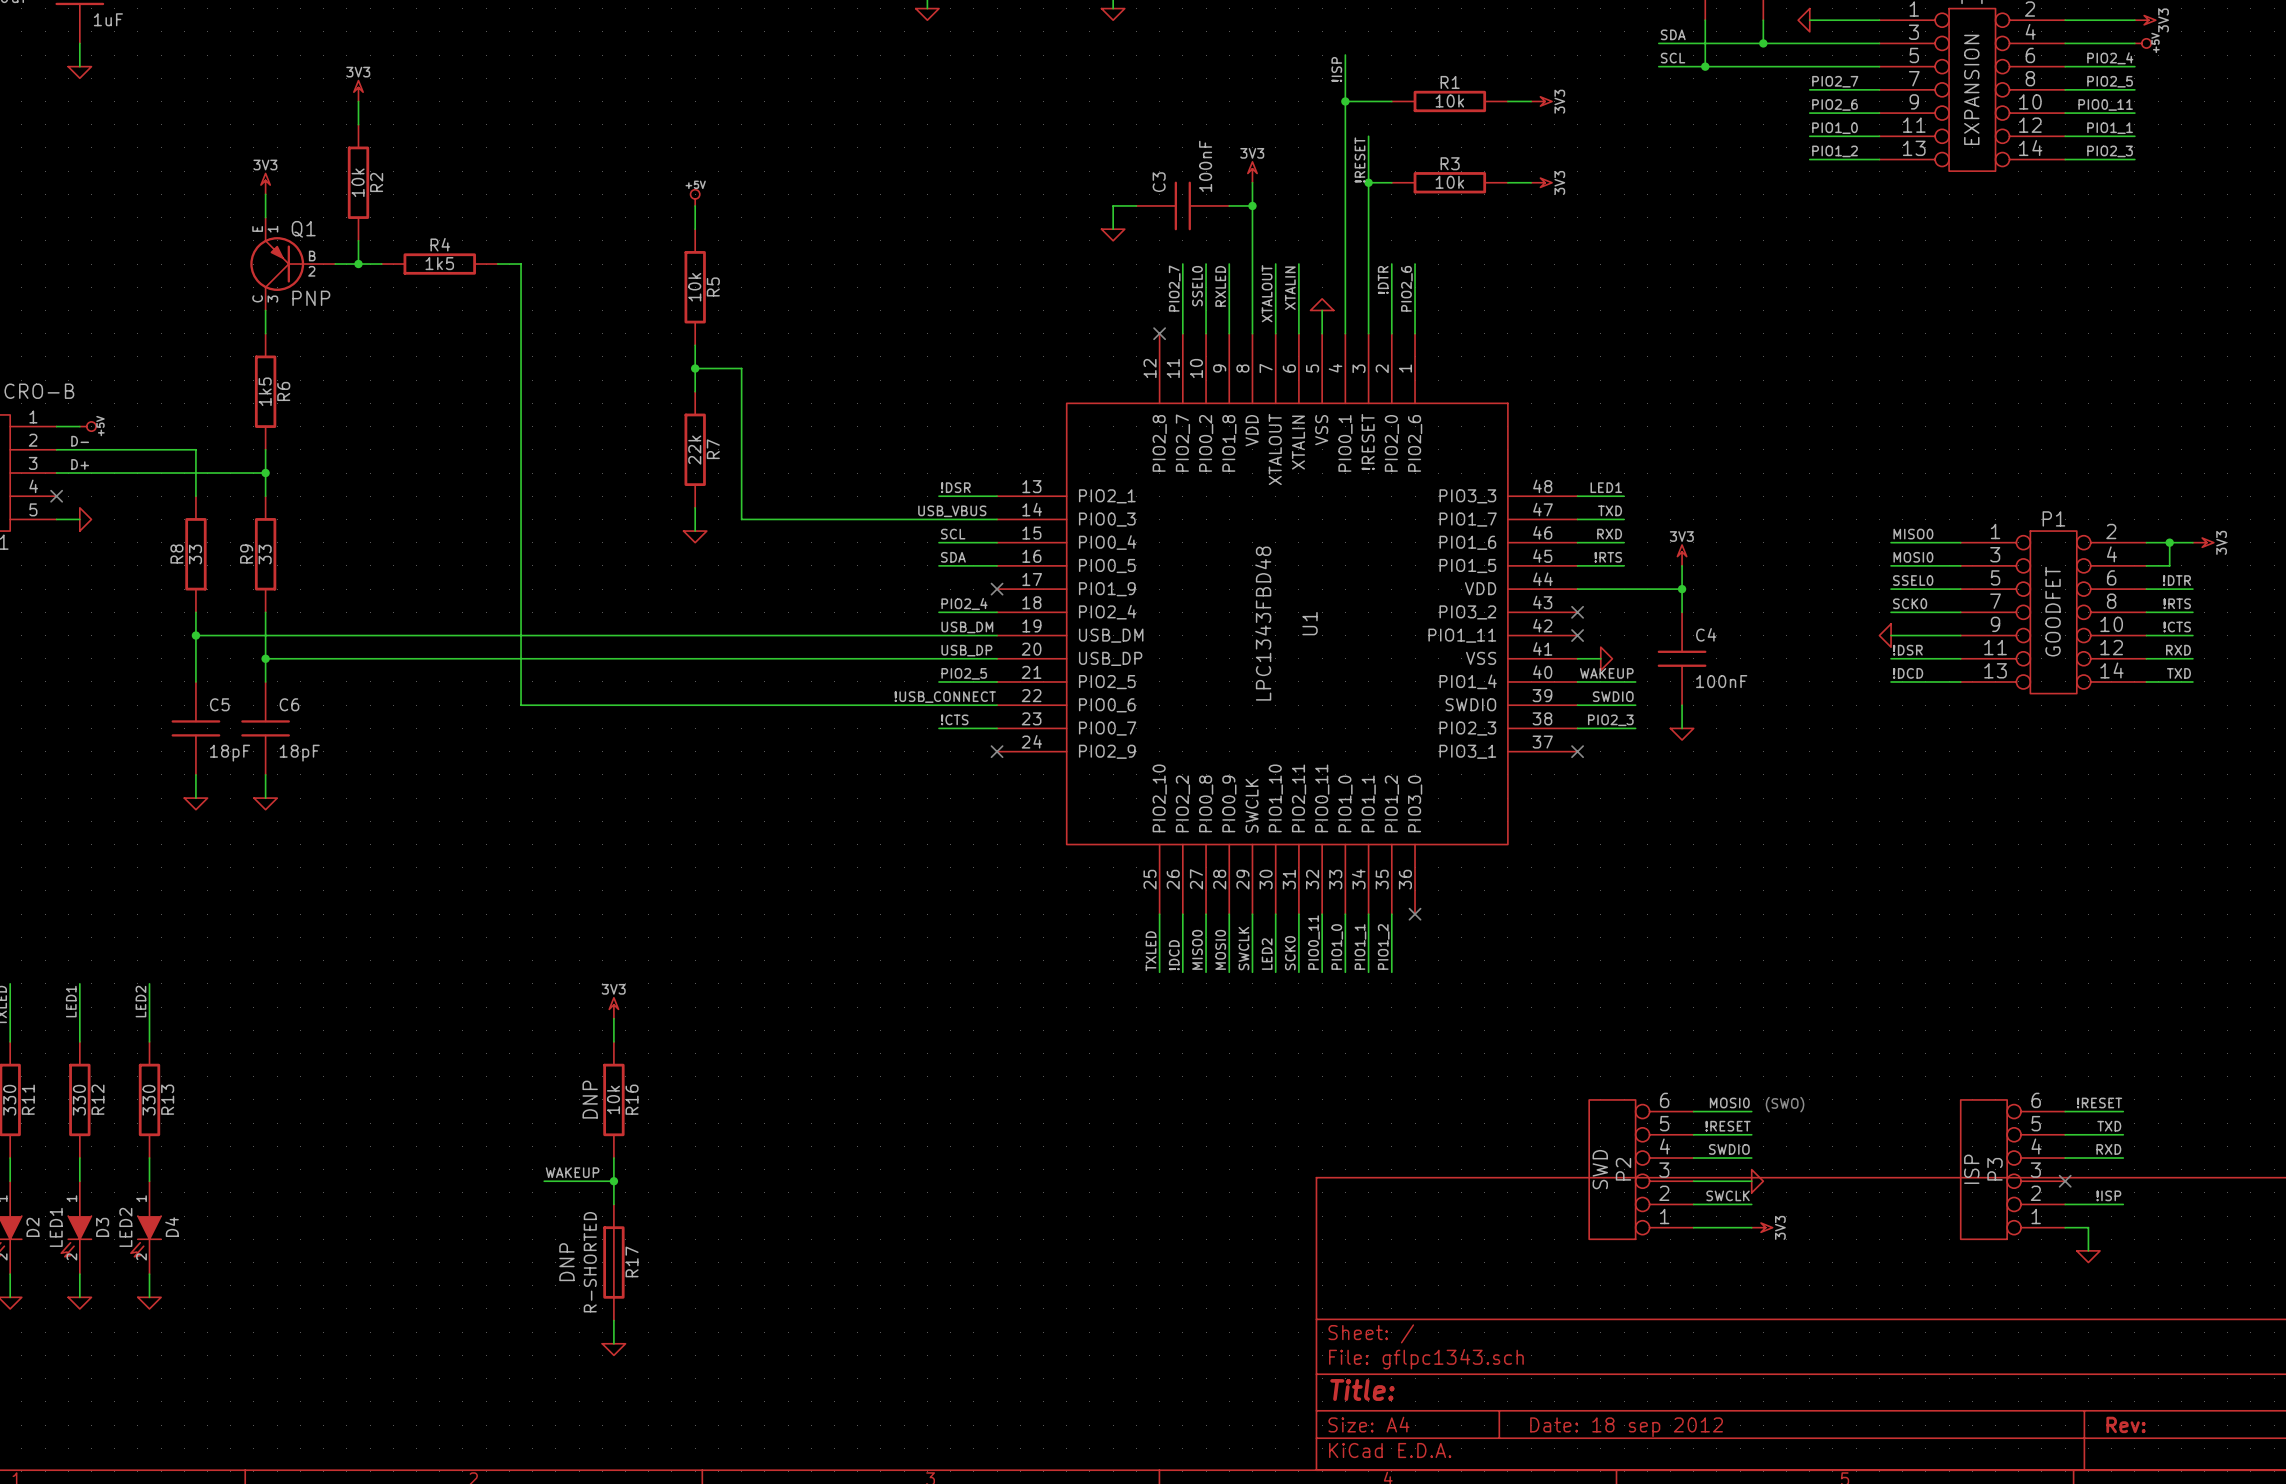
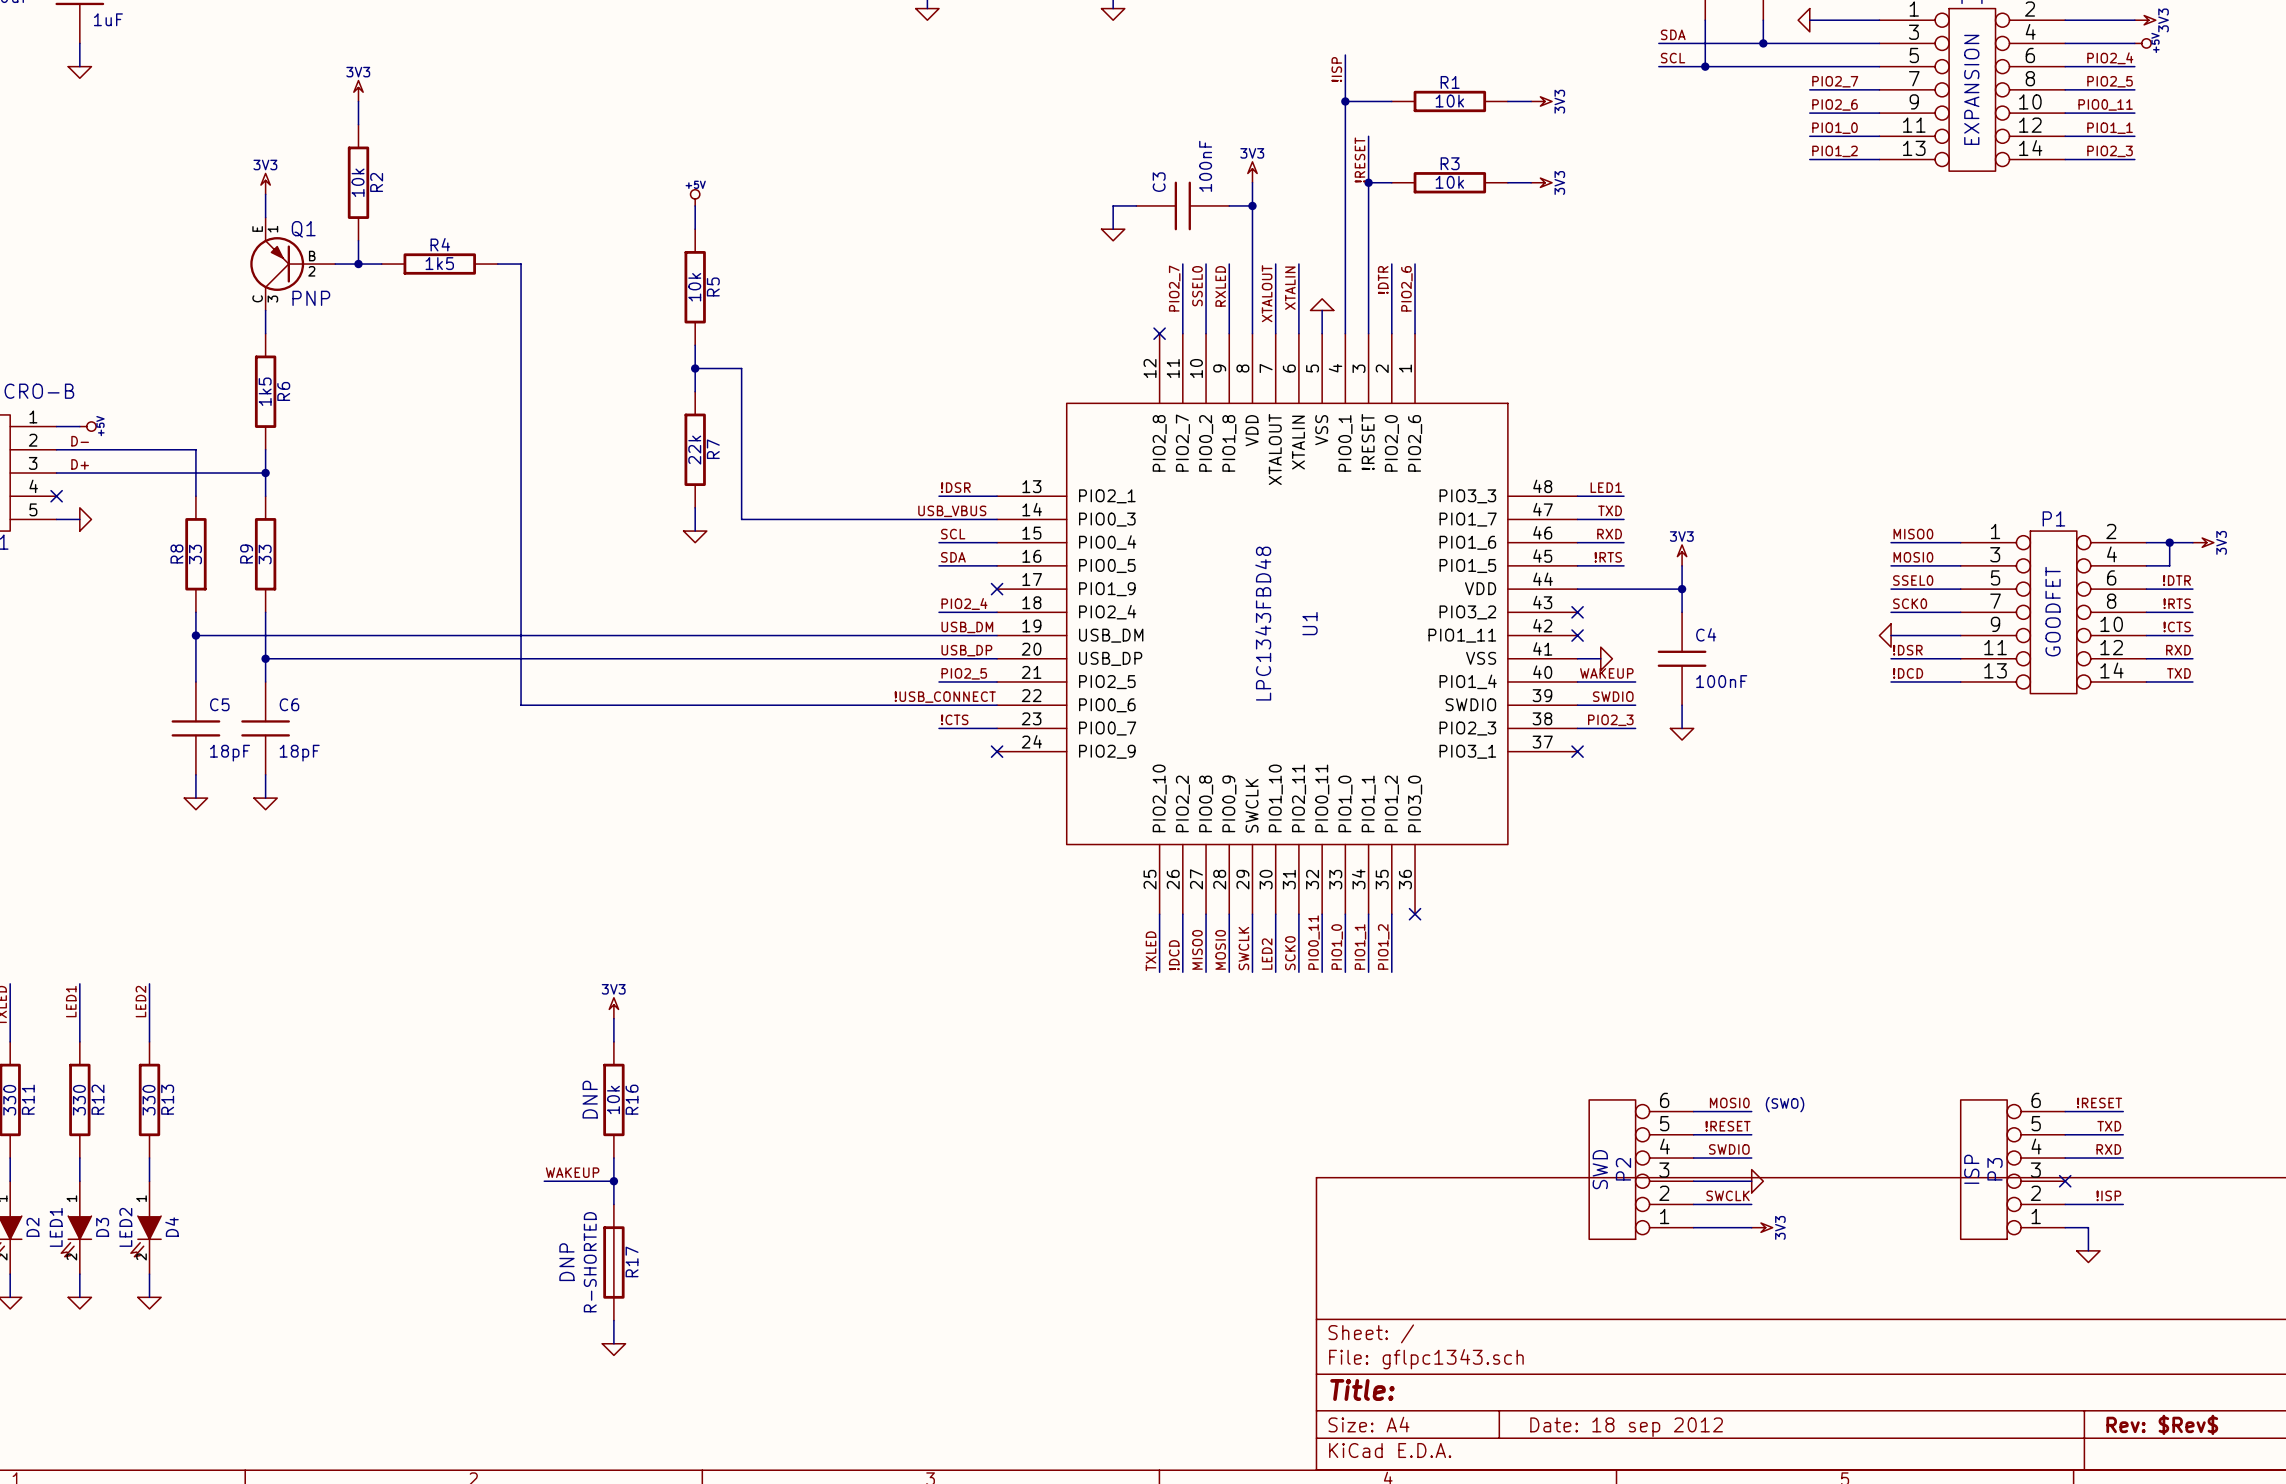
title block: Rev: (2126, 1424) -> Rev: $Rev$ (2162, 1424)

